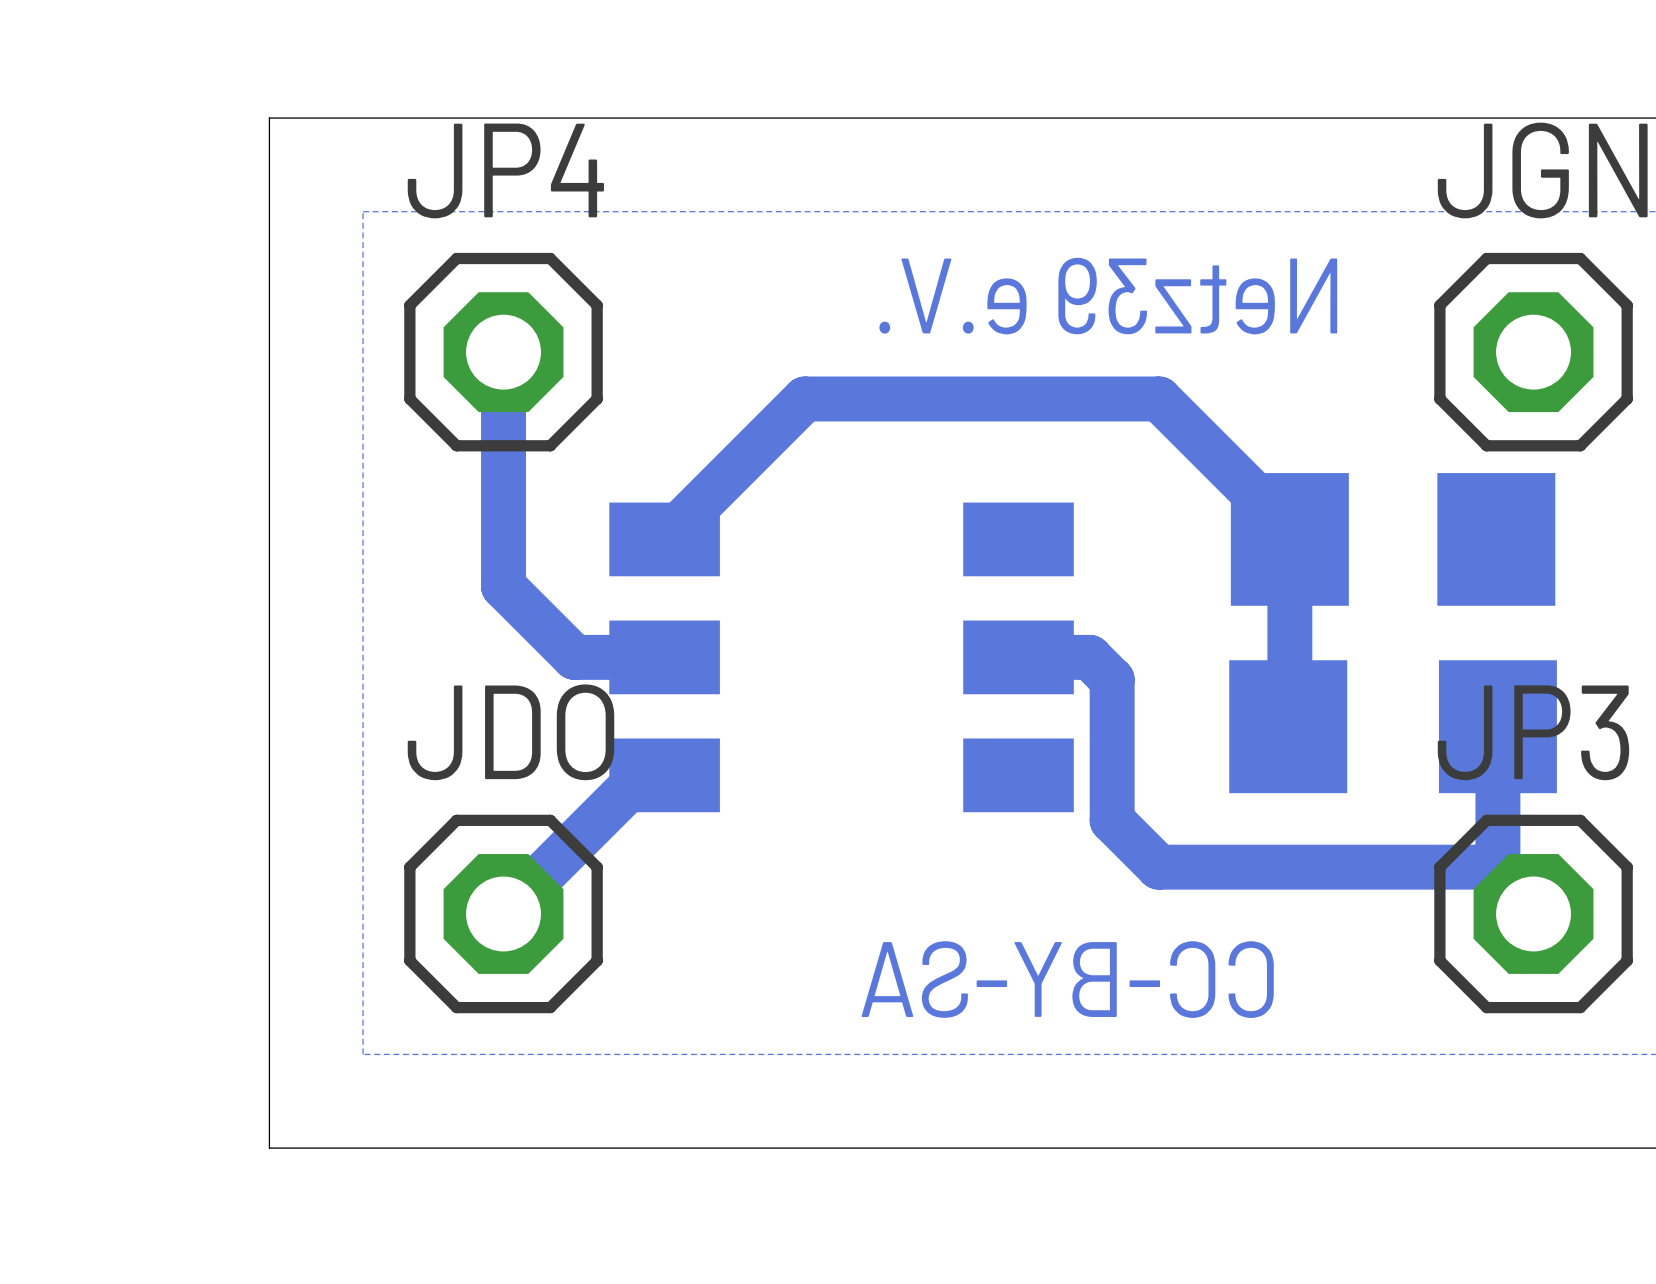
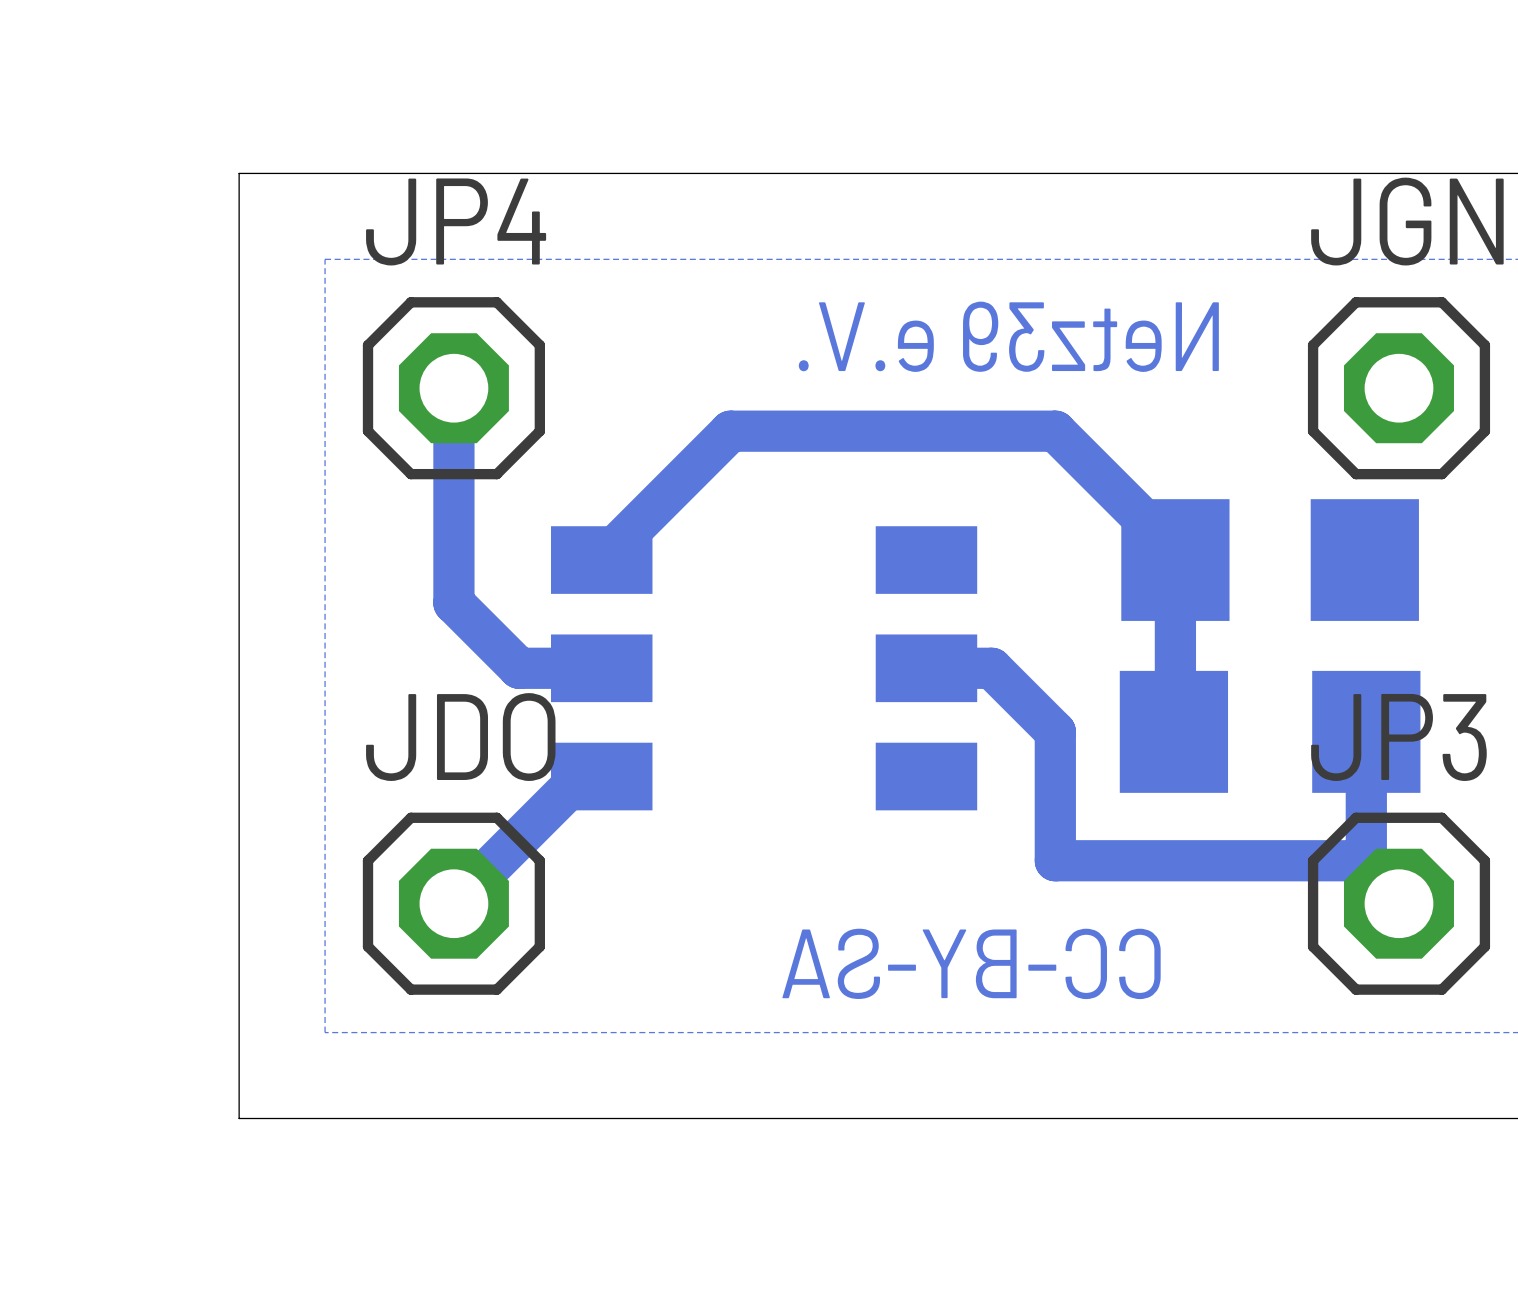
bottom track: (1112, 679) (1112, 820) (1158, 867) -> (1012, 688) (1055, 731) (1055, 860)

